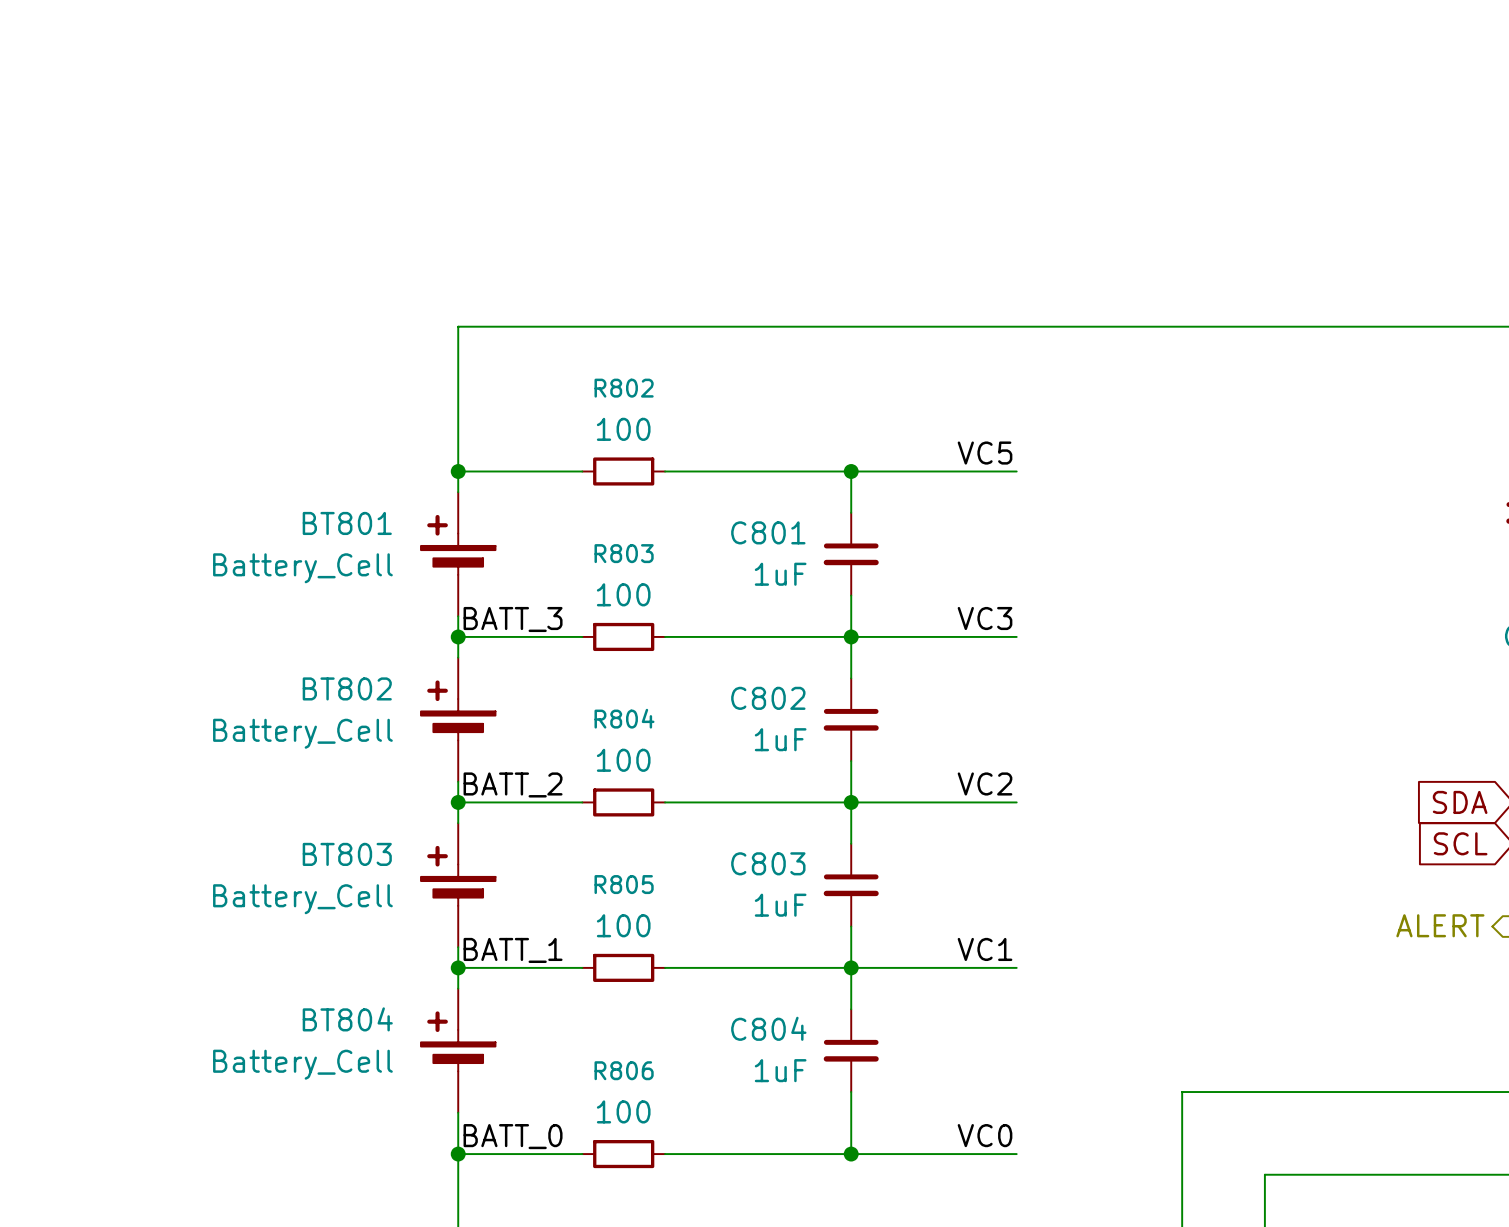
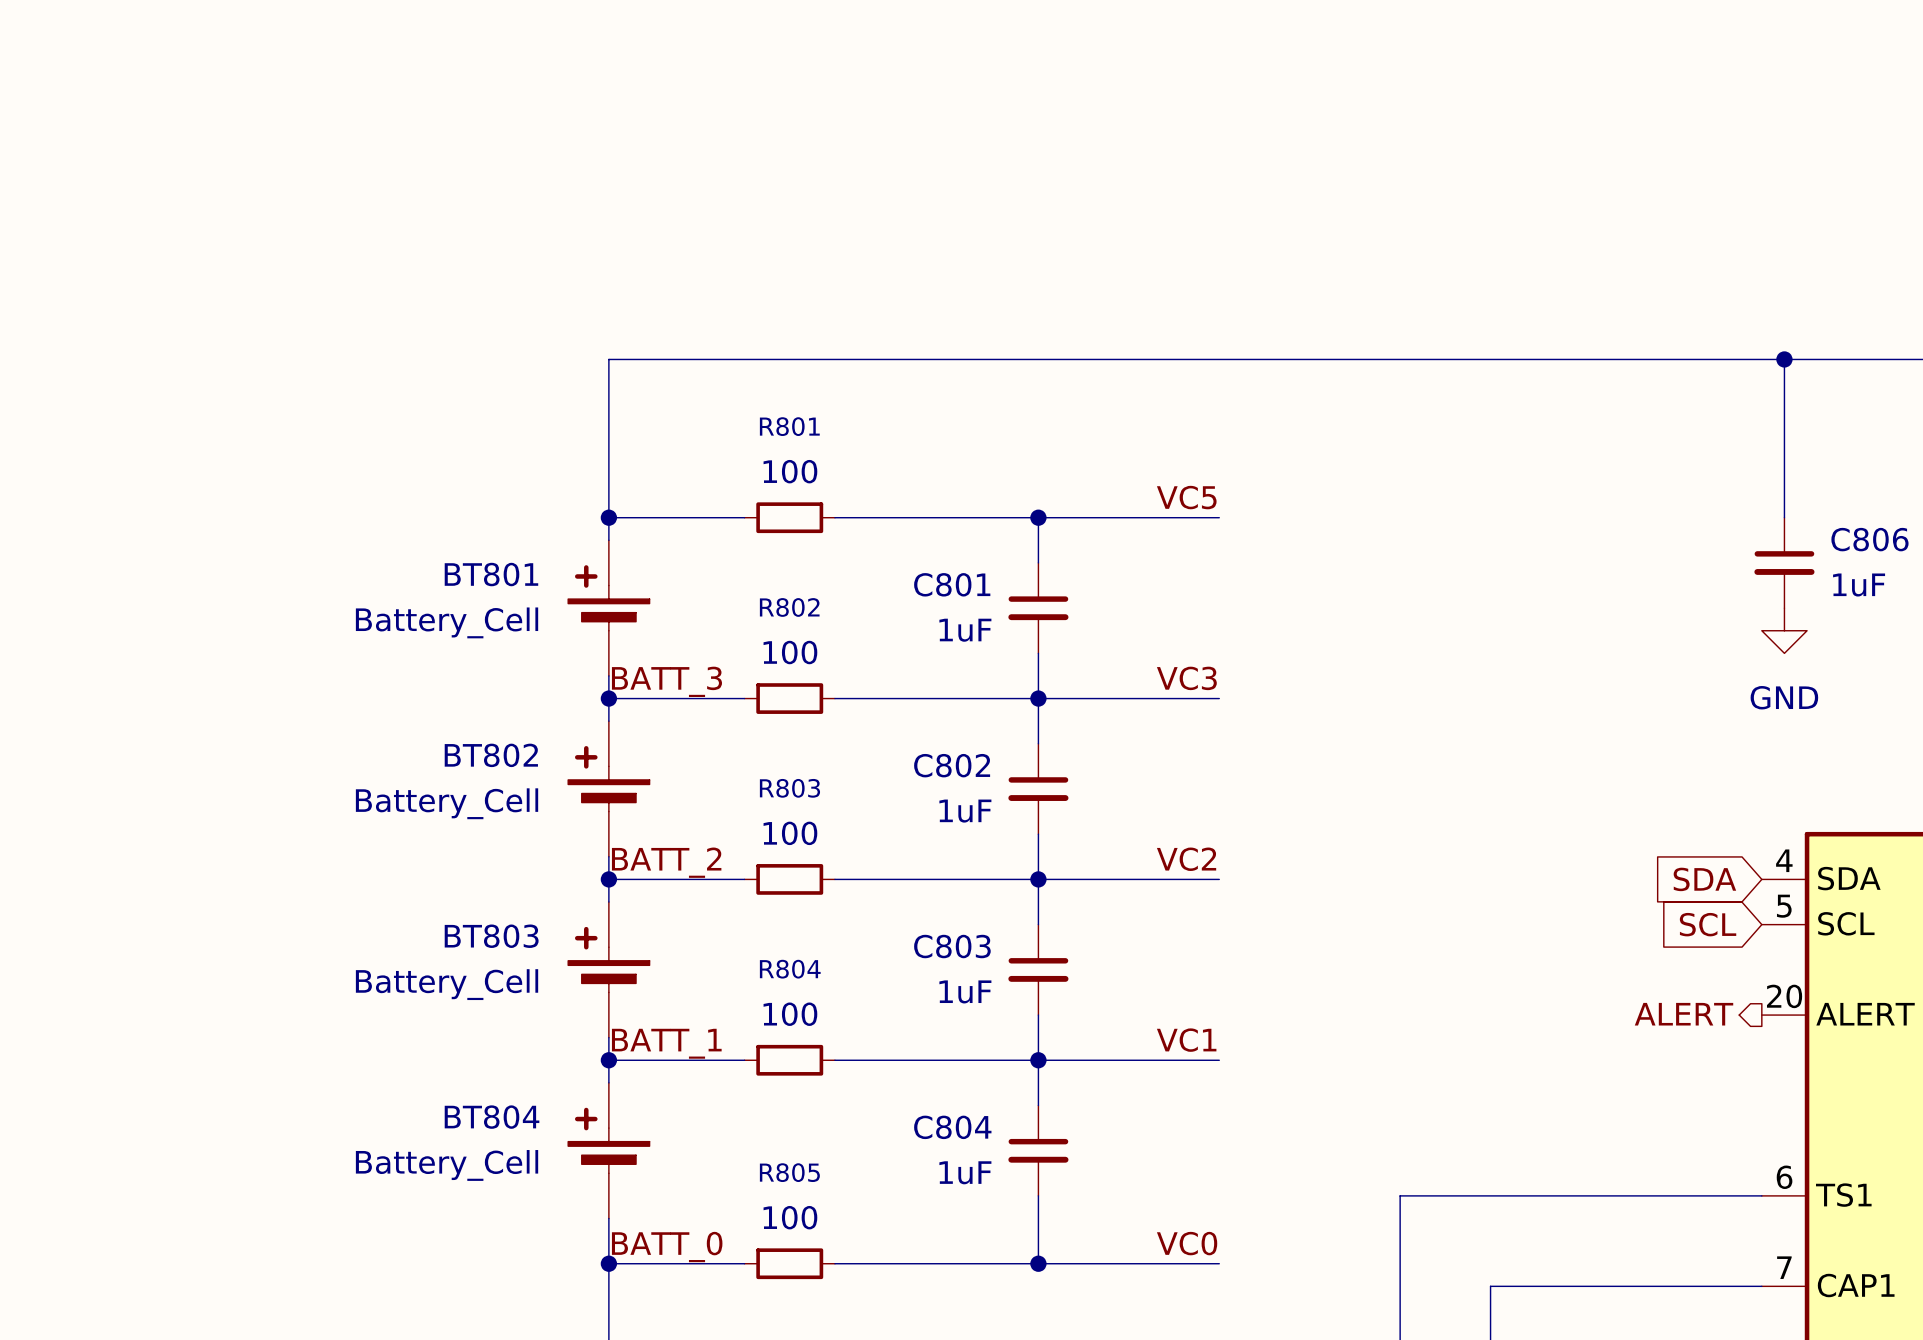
R802 name: R802 (624, 388) -> R801 (789, 426)
R803 name: R803 (624, 553) -> R802 (789, 607)
R804 name: R804 (624, 718) -> R803 (789, 788)
R805 name: R805 (624, 884) -> R804 (790, 969)
R806 name: R806 (624, 1070) -> R805 (789, 1172)

